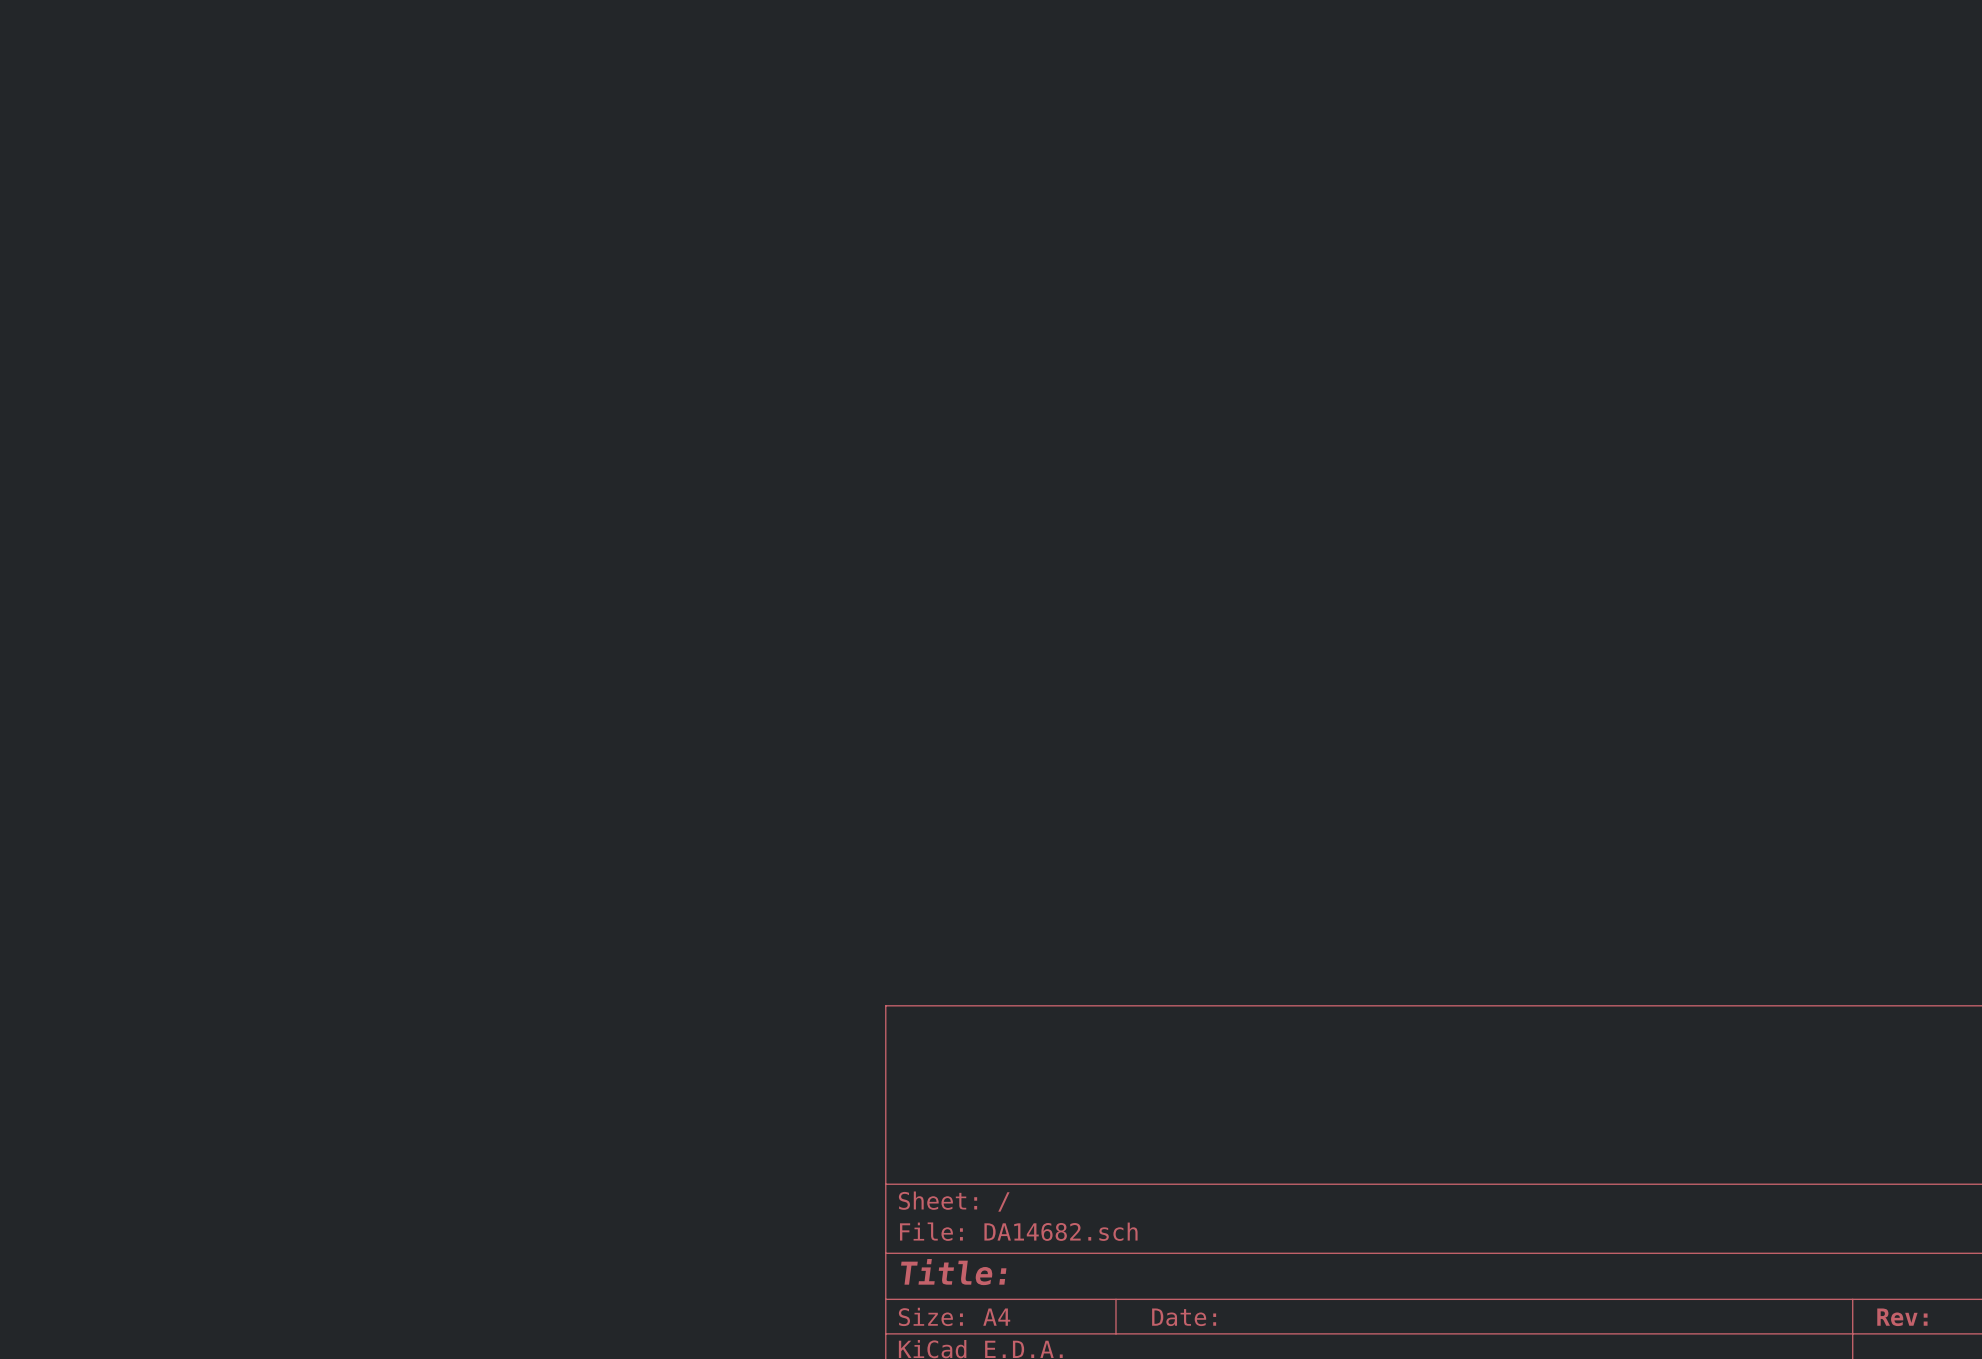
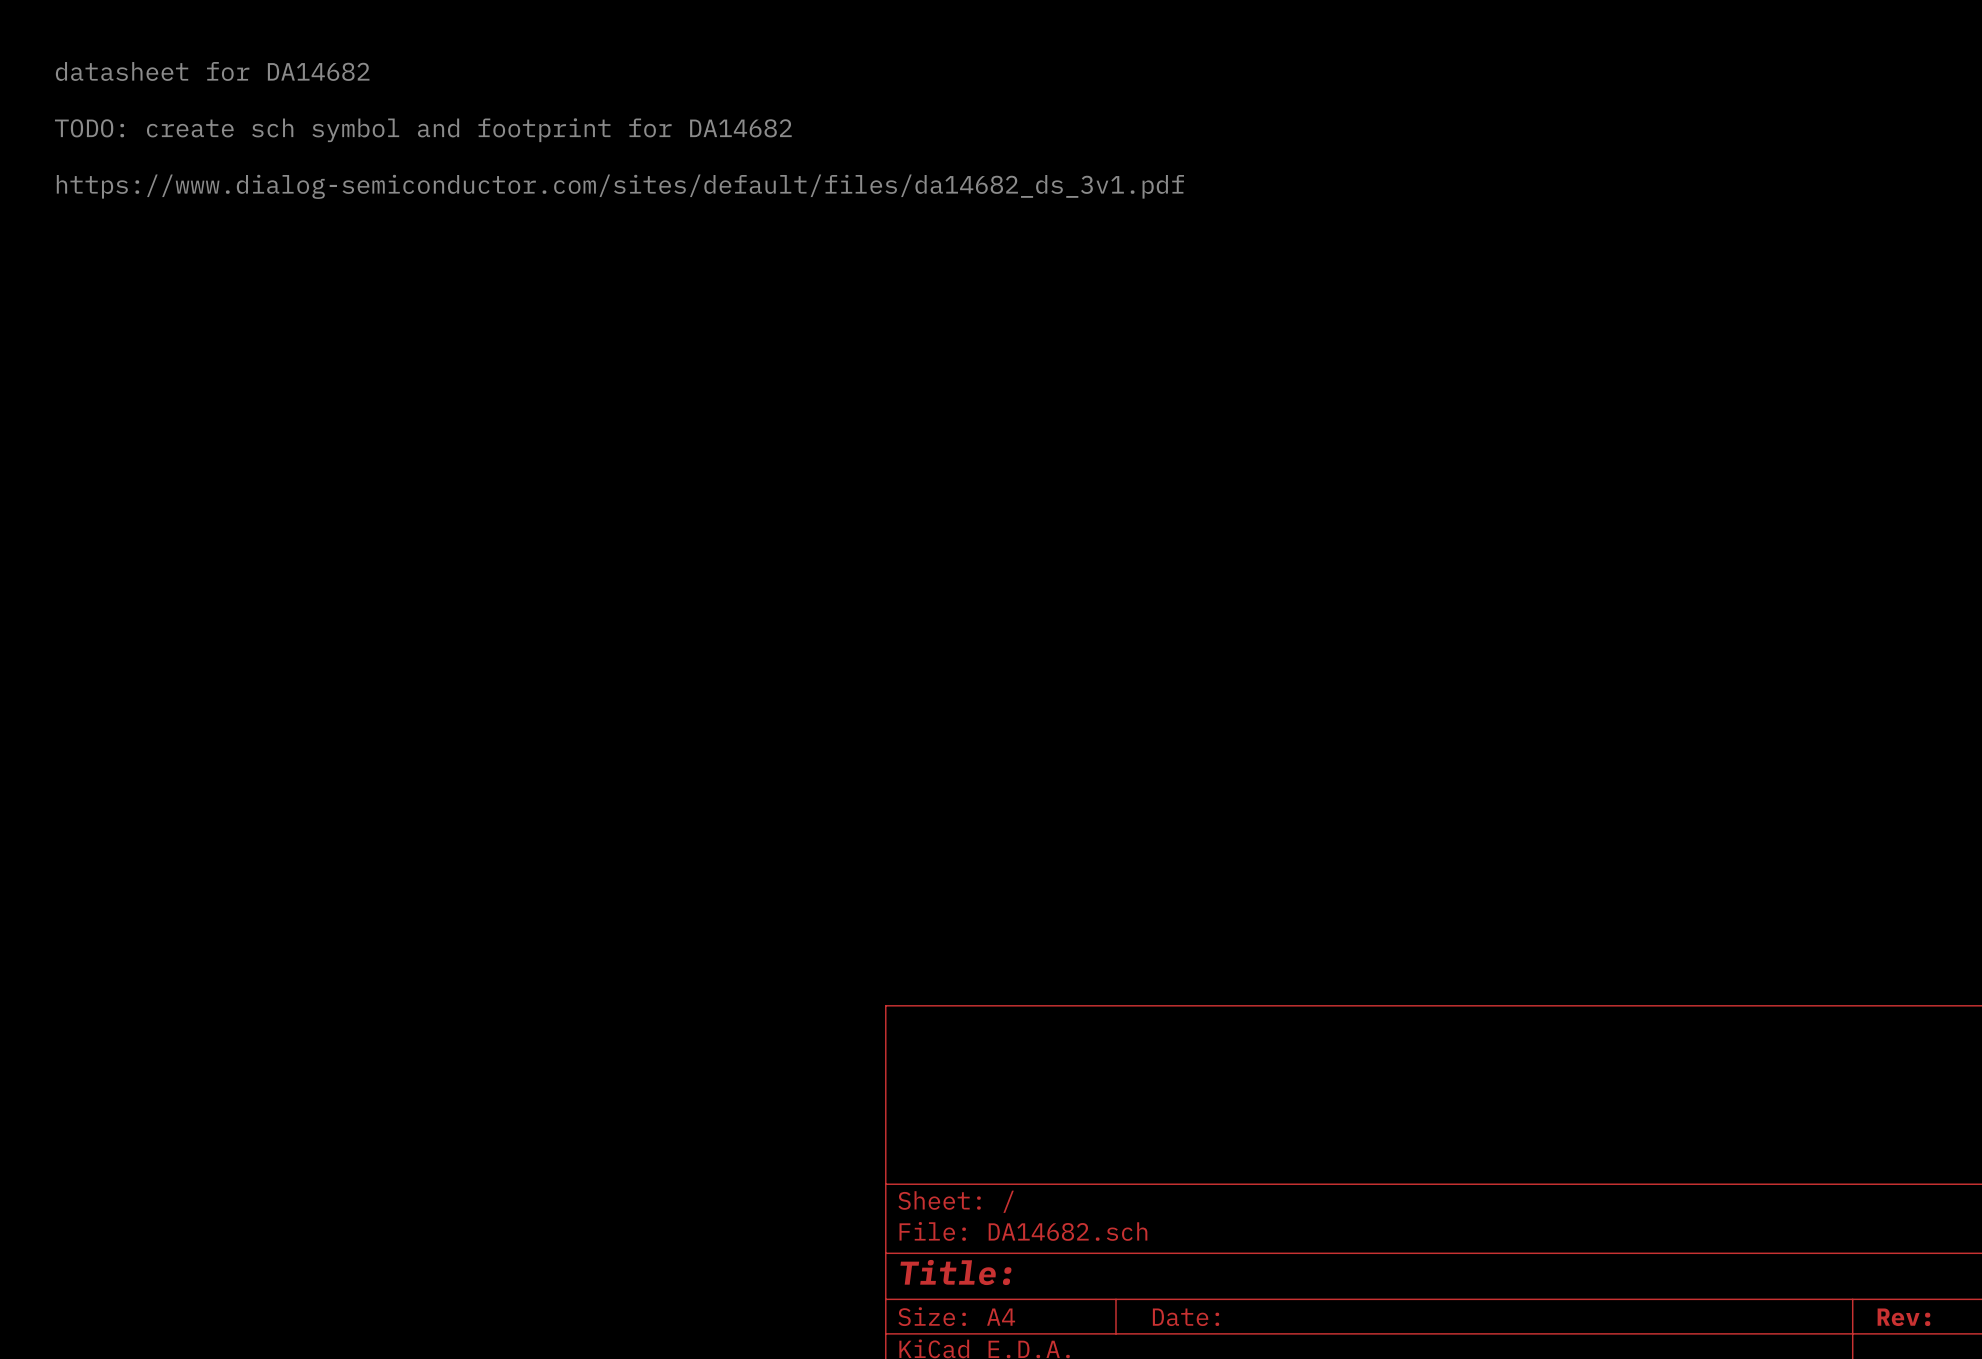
text: none -> datasheet for DA14682 (212, 71)
text: none -> TODO: create sch symbol and footprint for DA14682 (423, 130)
text: none -> https://www.dialog-semiconductor.com/sites/default/files/da14682_ds_3v1.pdf (620, 186)

